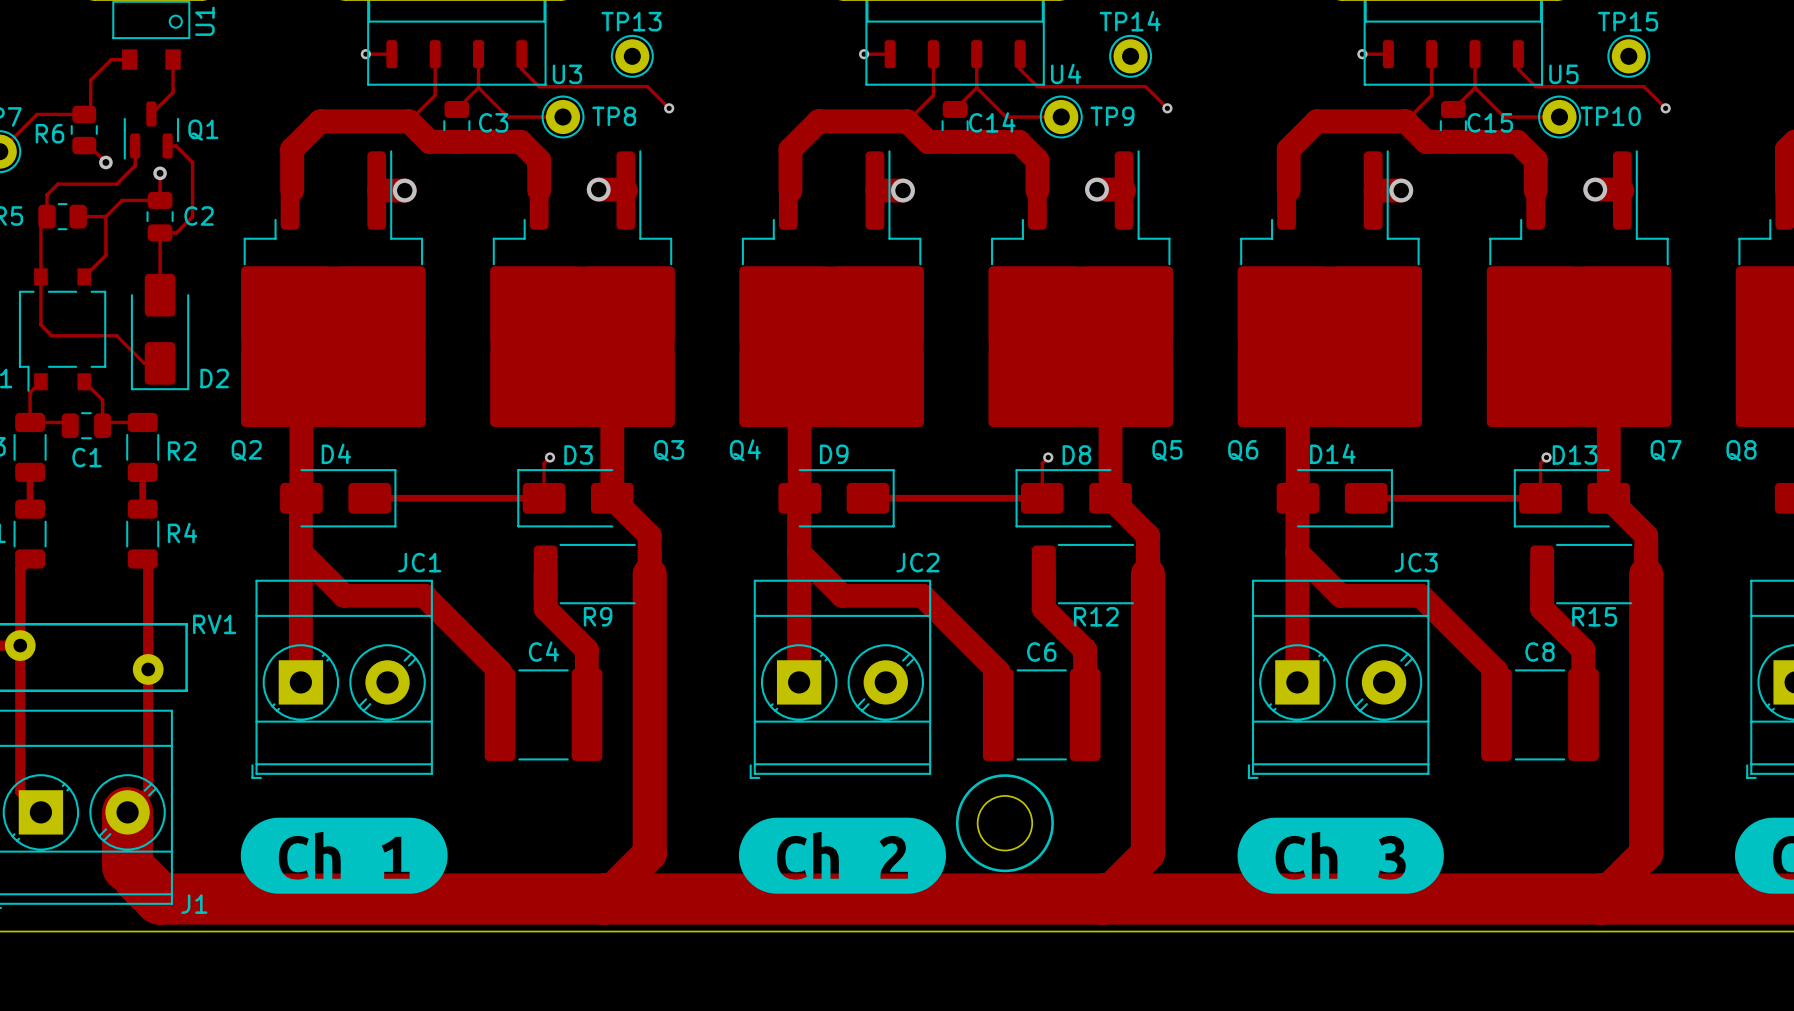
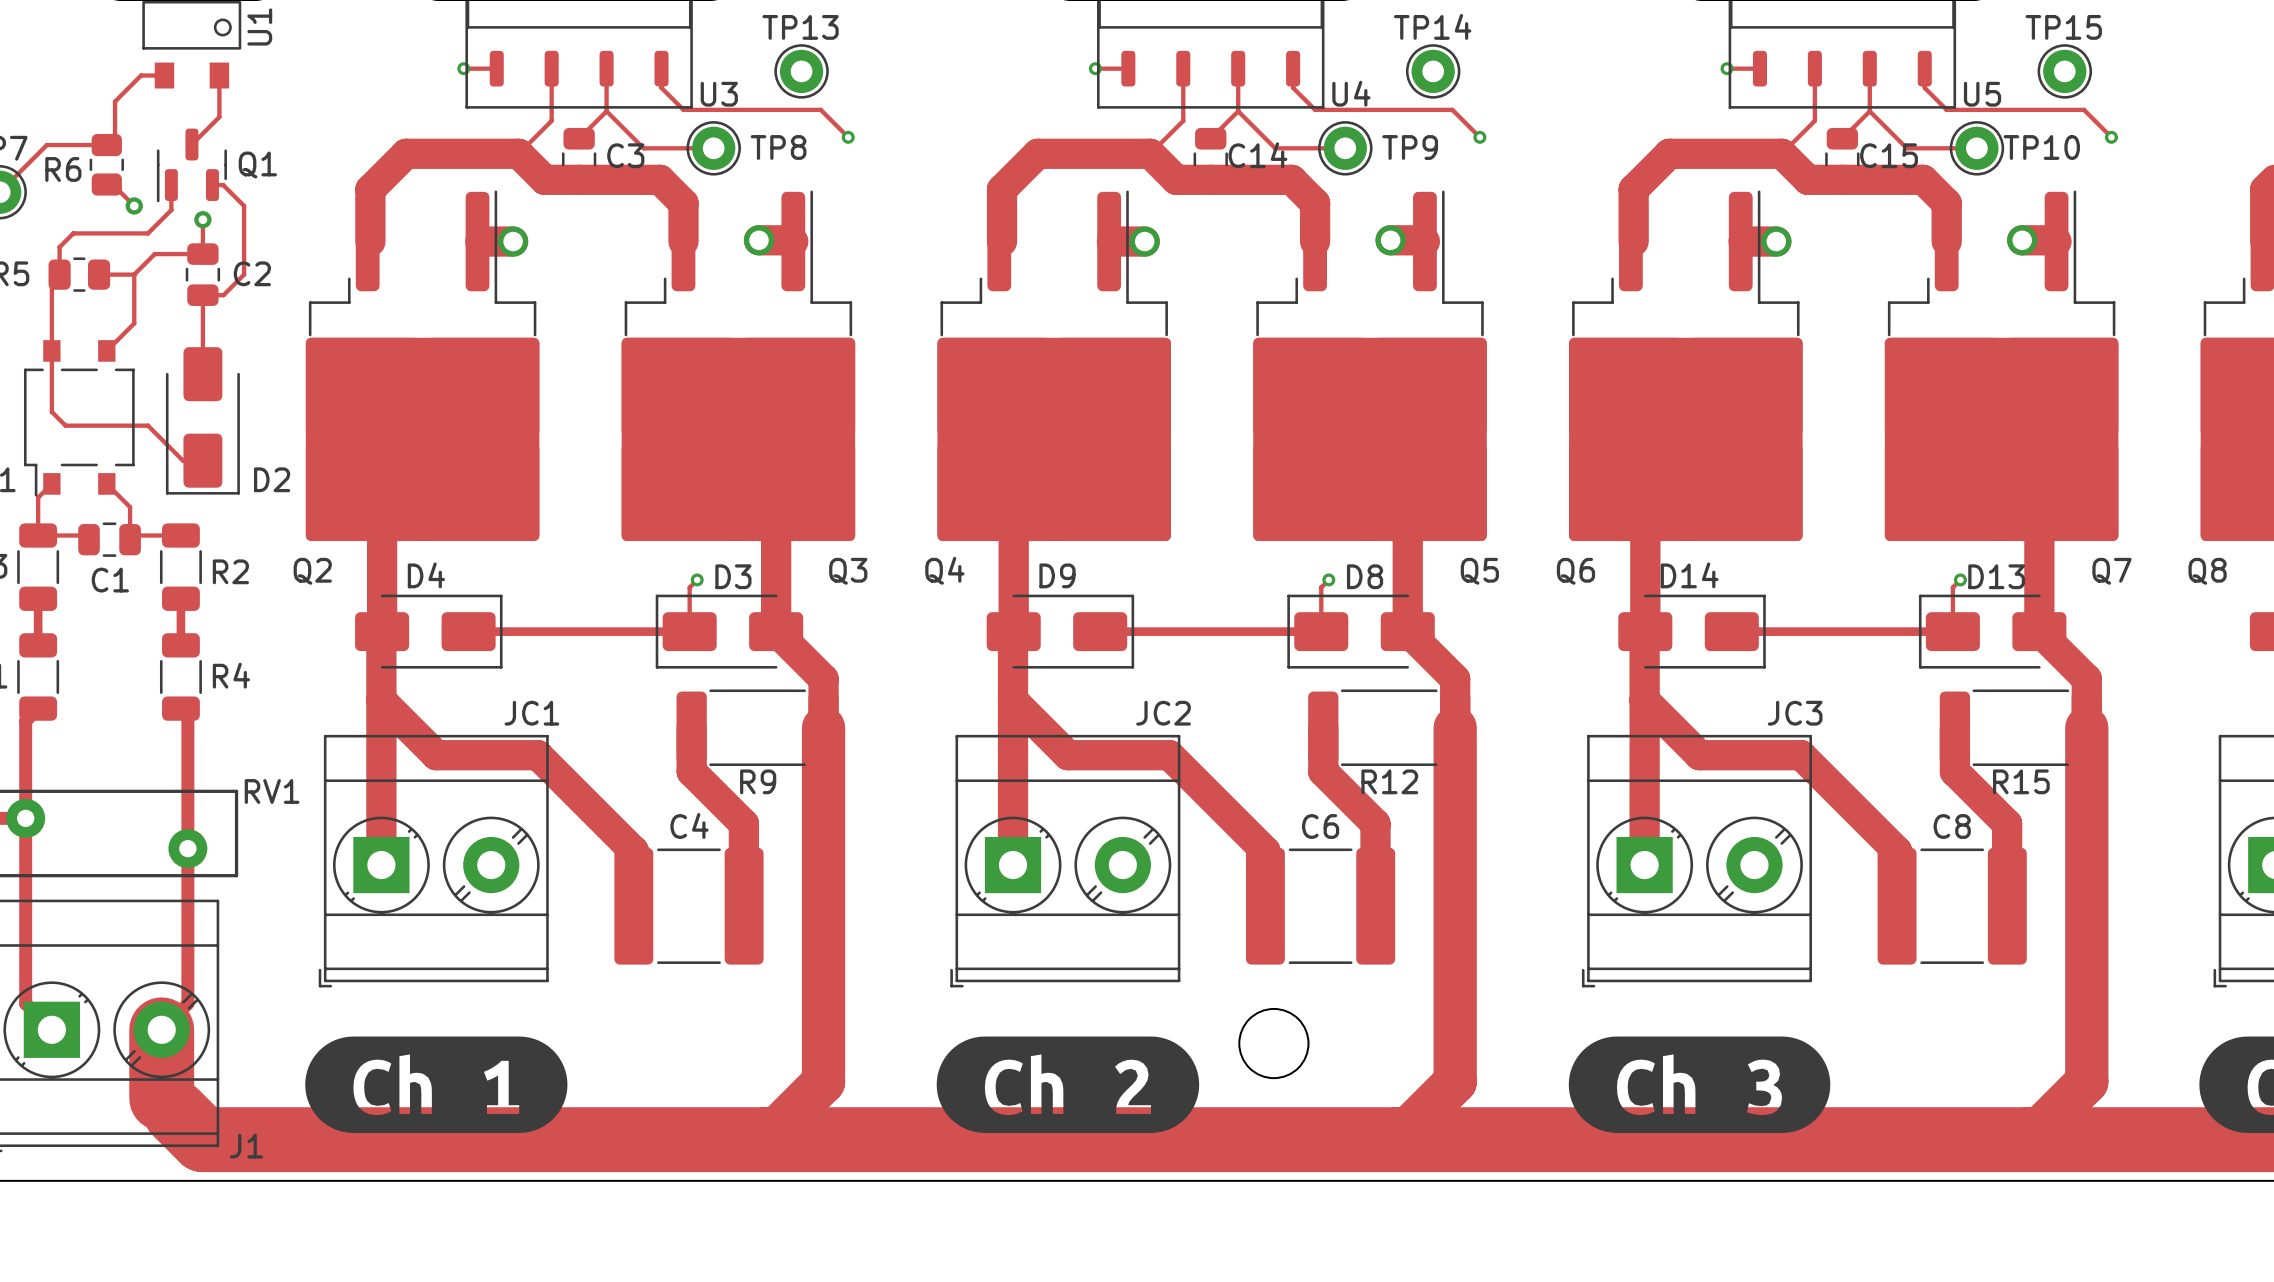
drawing: [955, 774, 1054, 873] -> none

